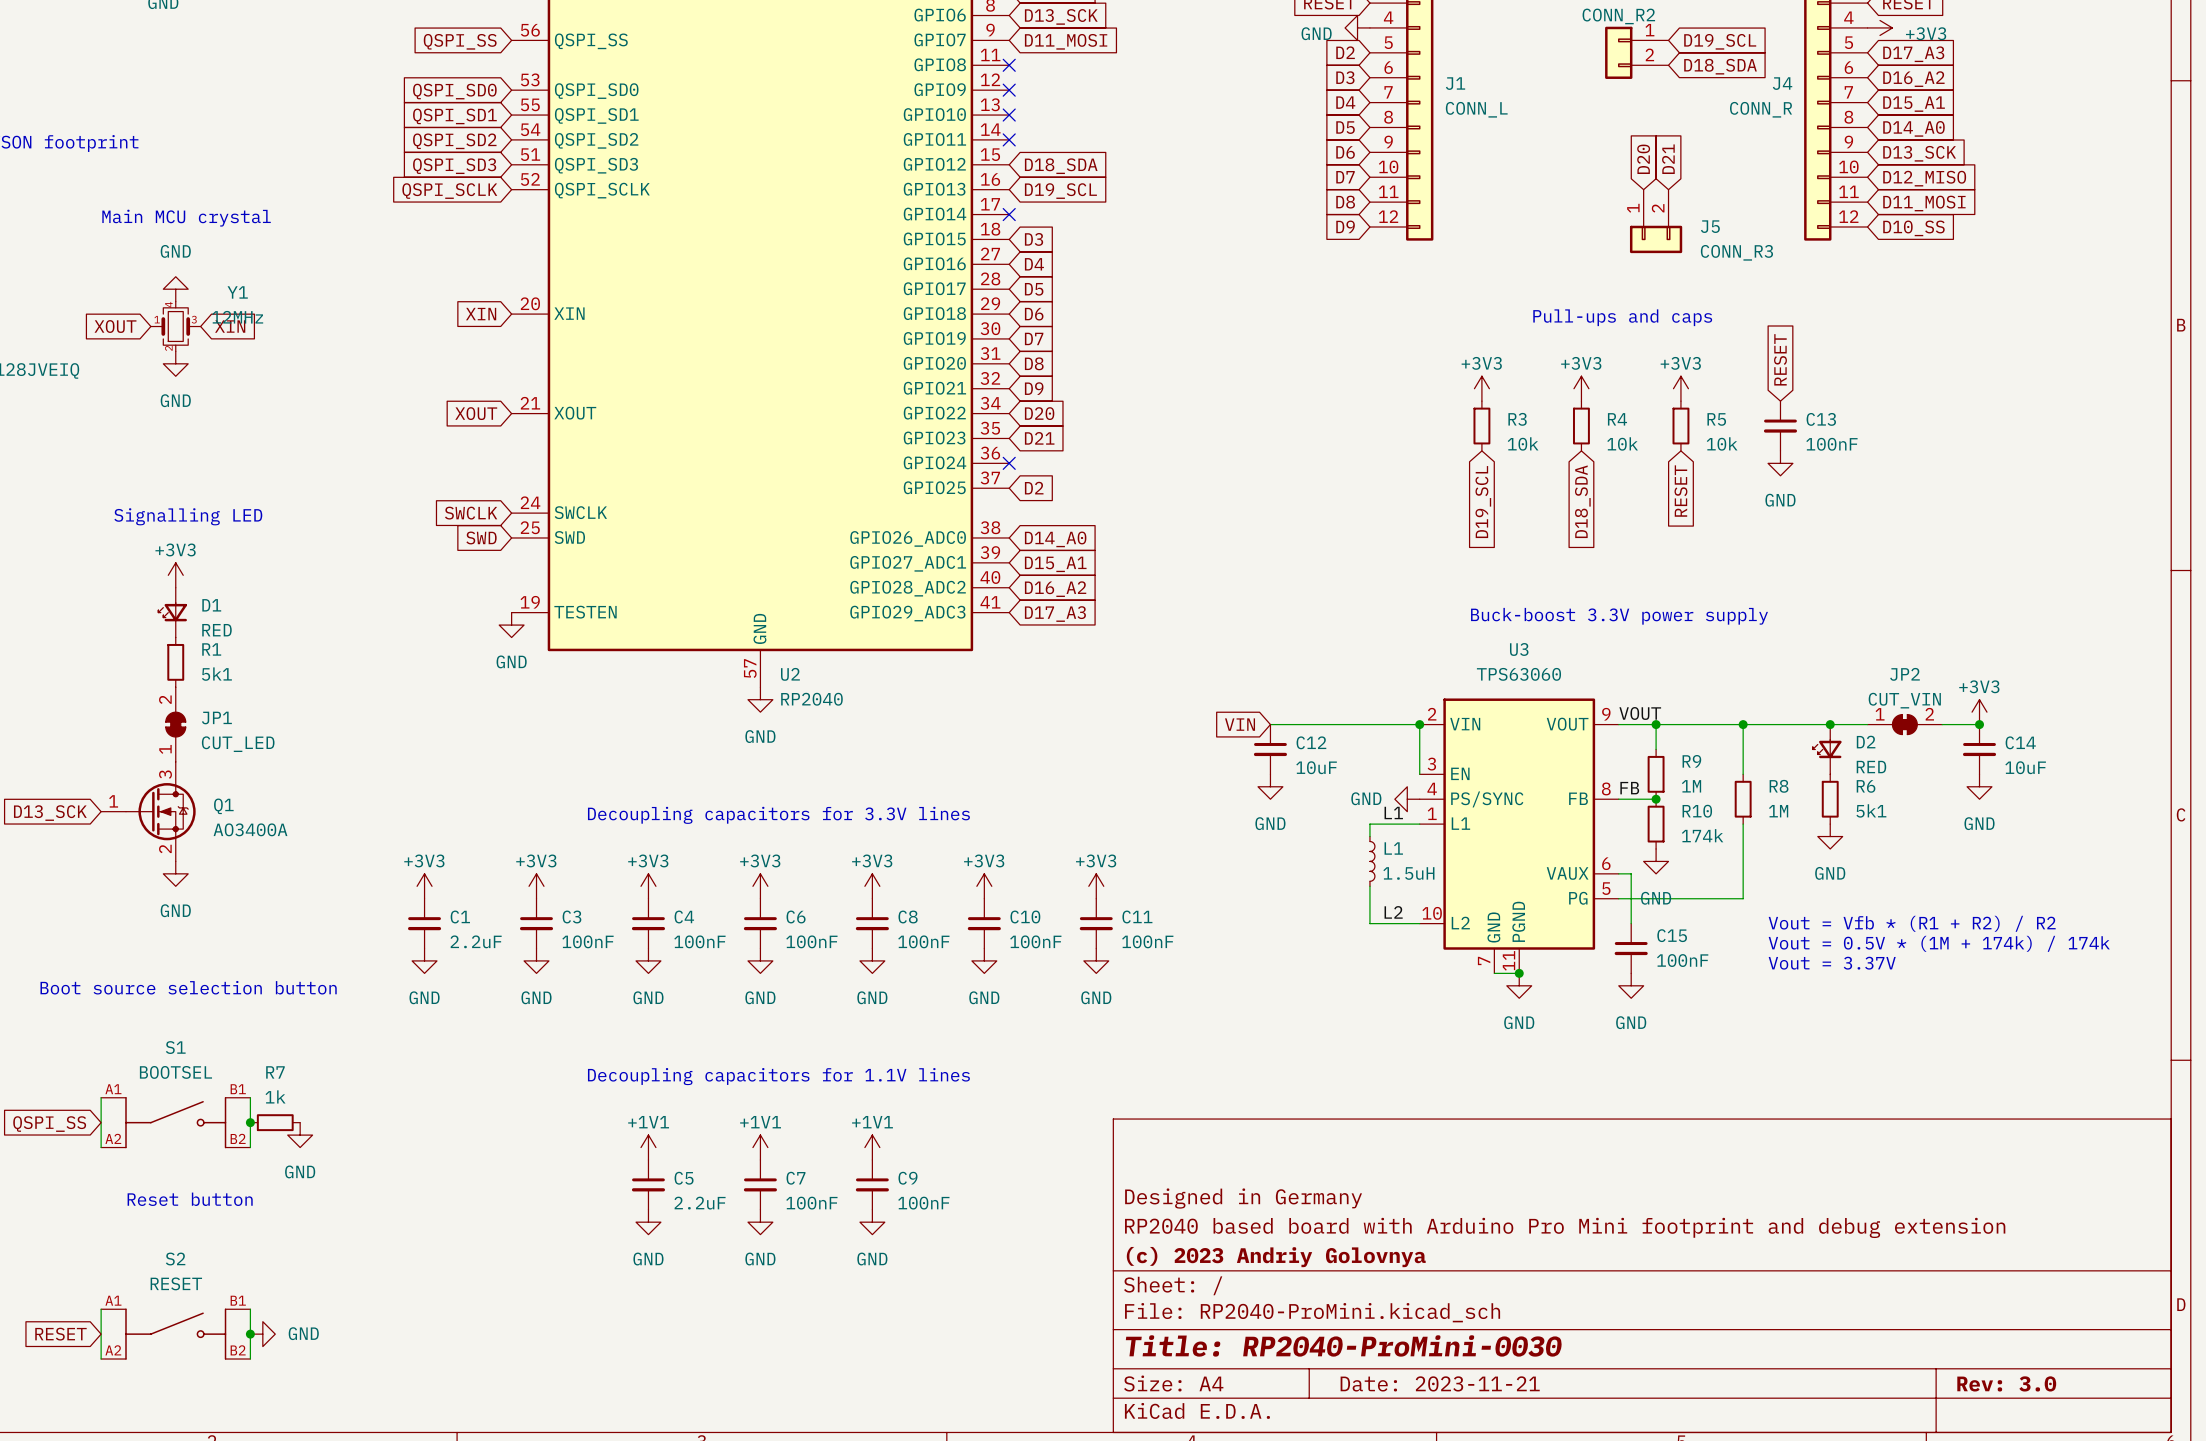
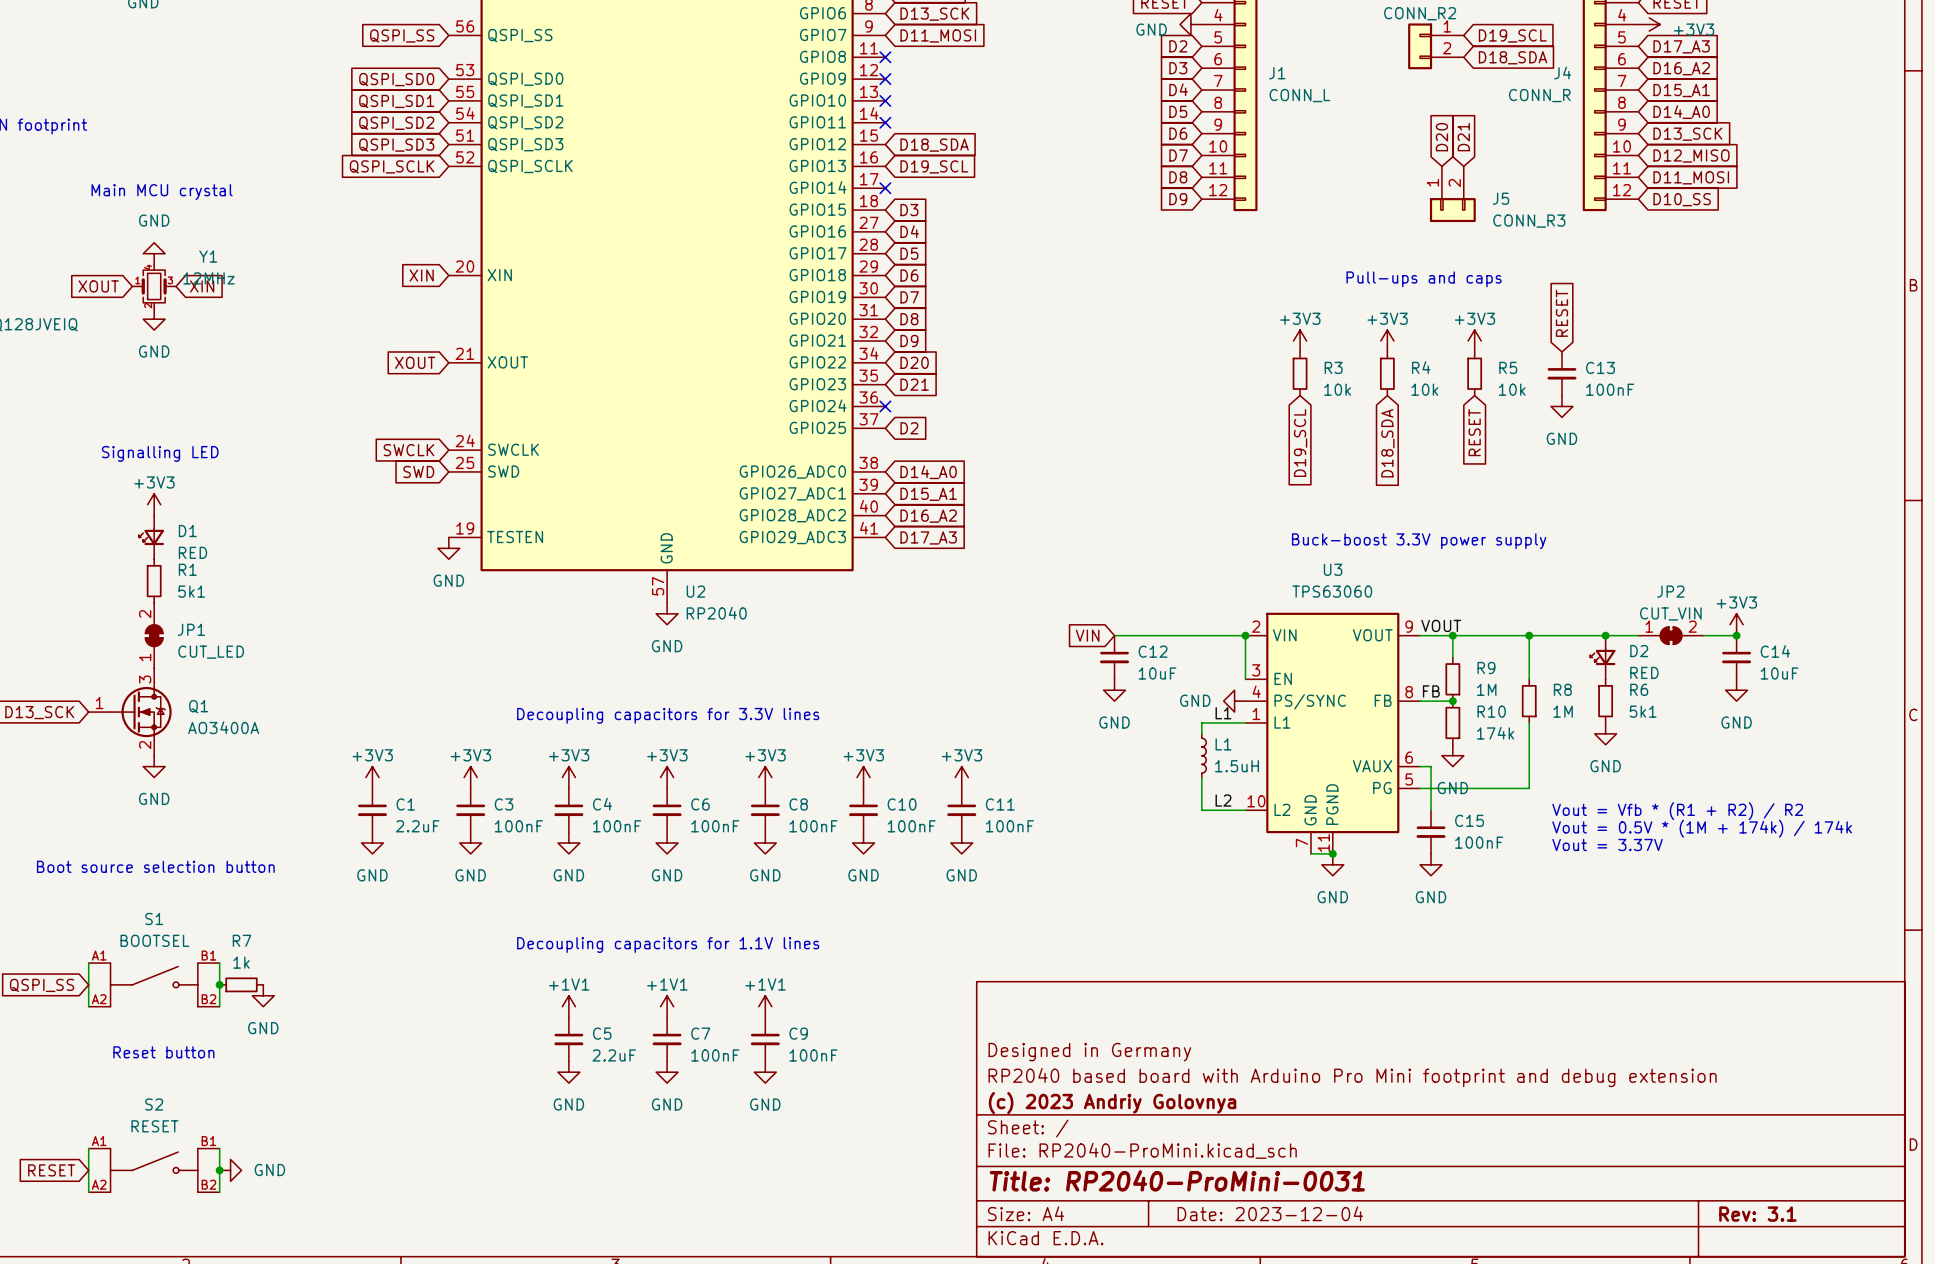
title block: Title: RP2040-ProMini-0030 (1343, 1345) -> Title: RP2040-ProMini-0031 (1177, 1180)
title block: Date: 2023-11-21 (1440, 1383) -> Date: 2023-12-04 (1270, 1213)
title block: Rev: 3.0 (2006, 1383) -> Rev: 3.1 (1757, 1214)

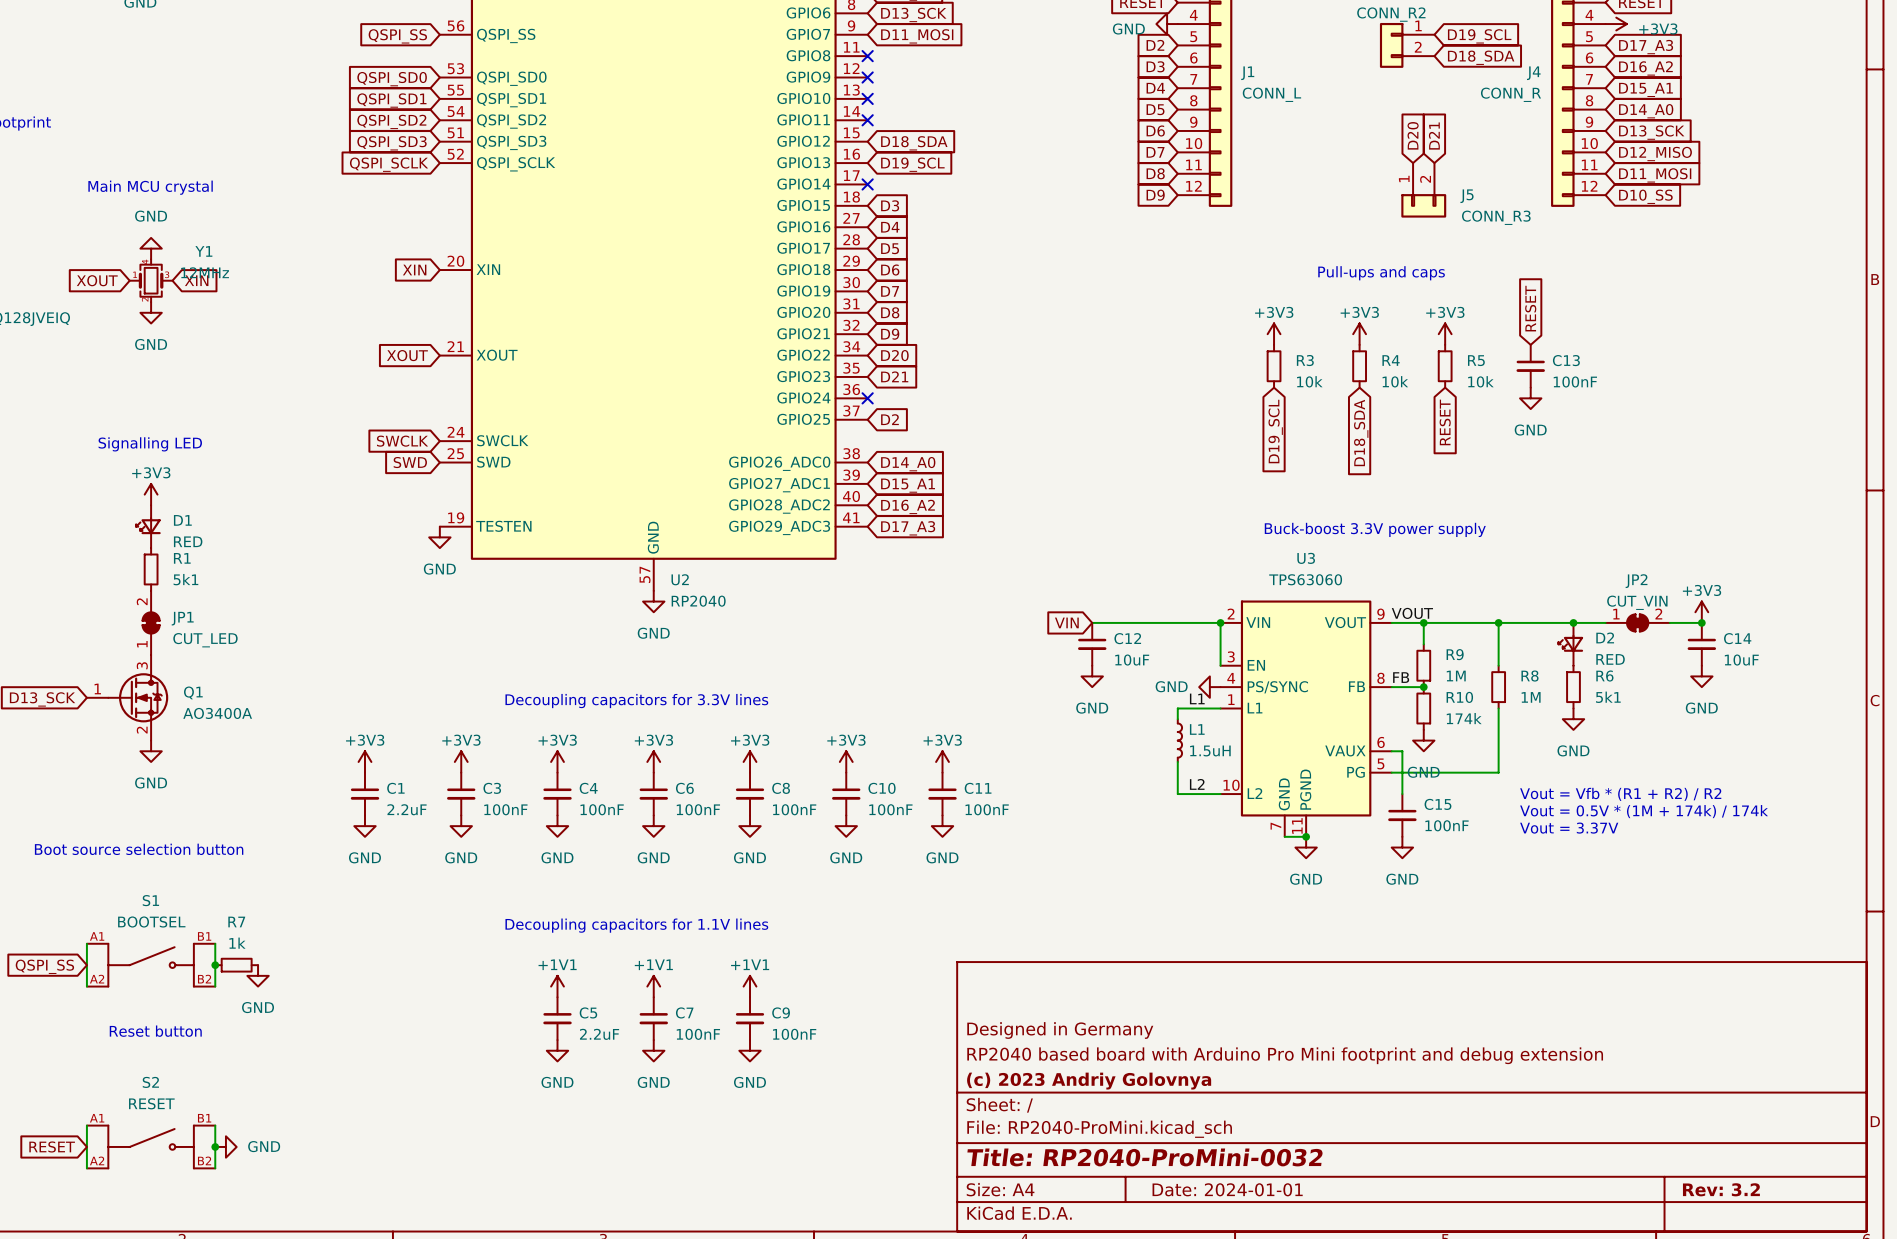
title block: Title: RP2040-ProMini-0031 (1177, 1180) -> Title: RP2040-ProMini-0032 (1145, 1157)
title block: Date: 2023-12-04 (1270, 1213) -> Date: 2024-01-01 (1227, 1189)
title block: Rev: 3.1 (1757, 1214) -> Rev: 3.2 (1721, 1189)

